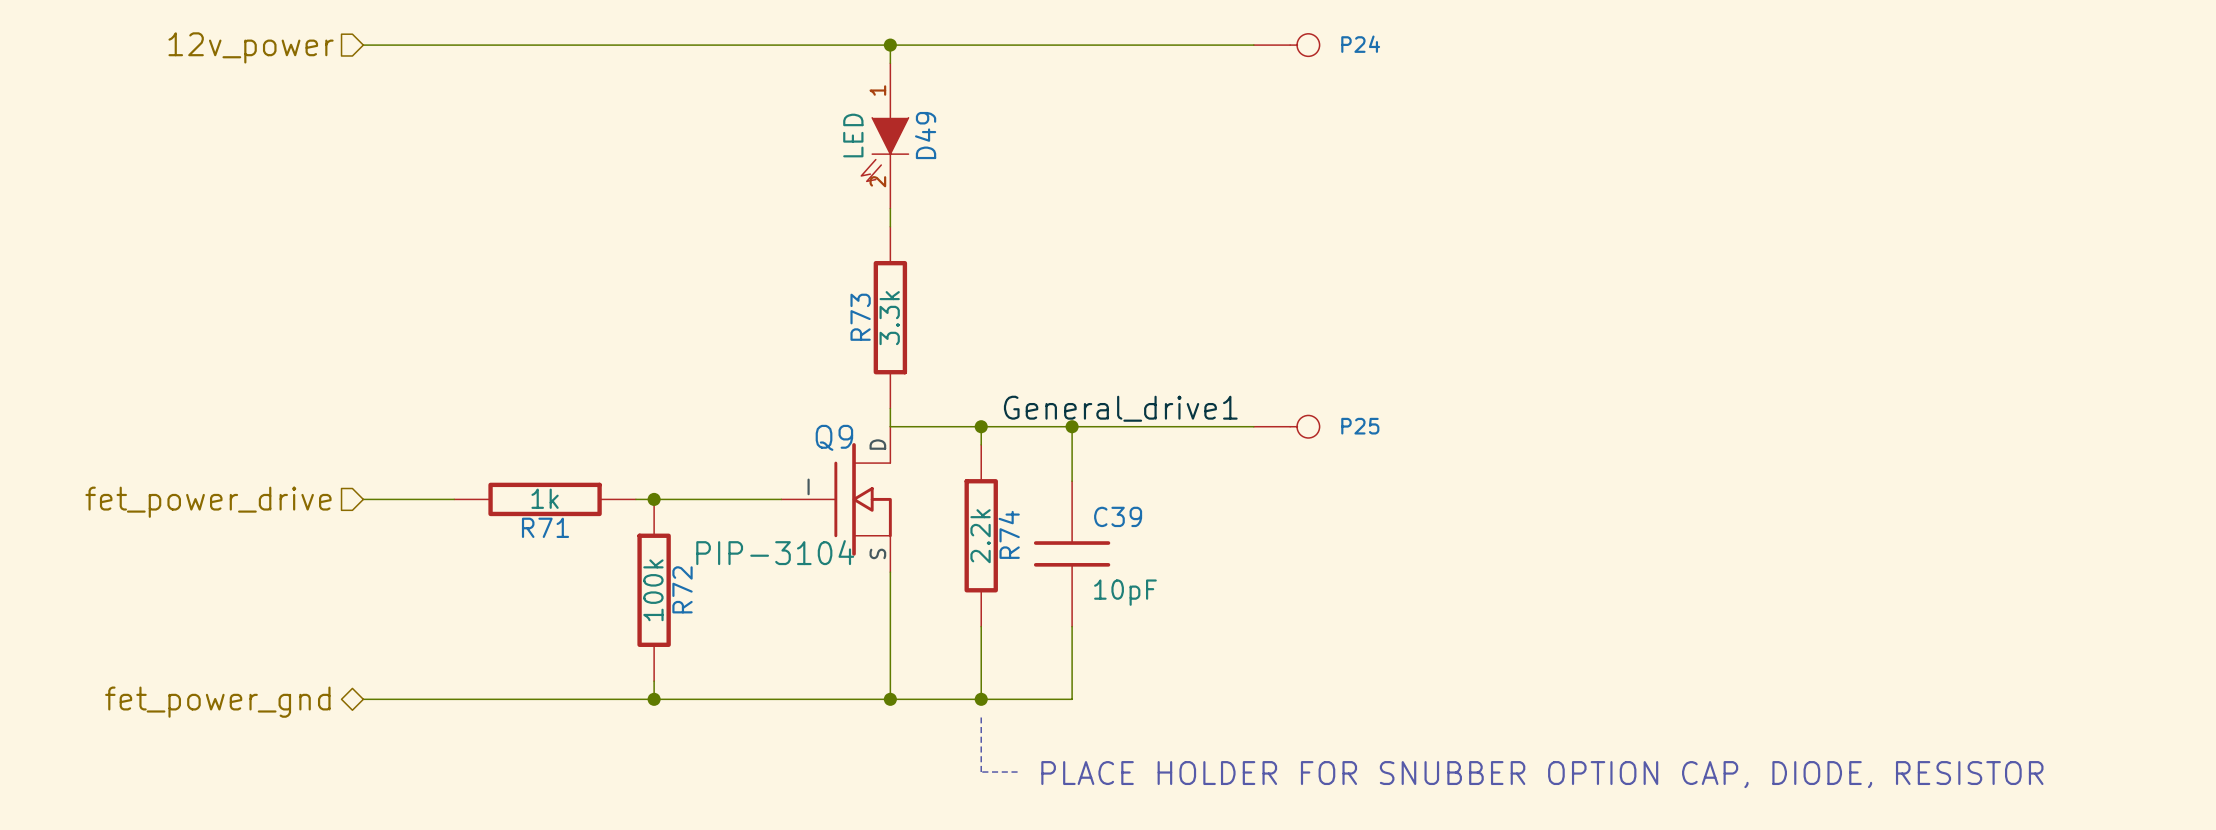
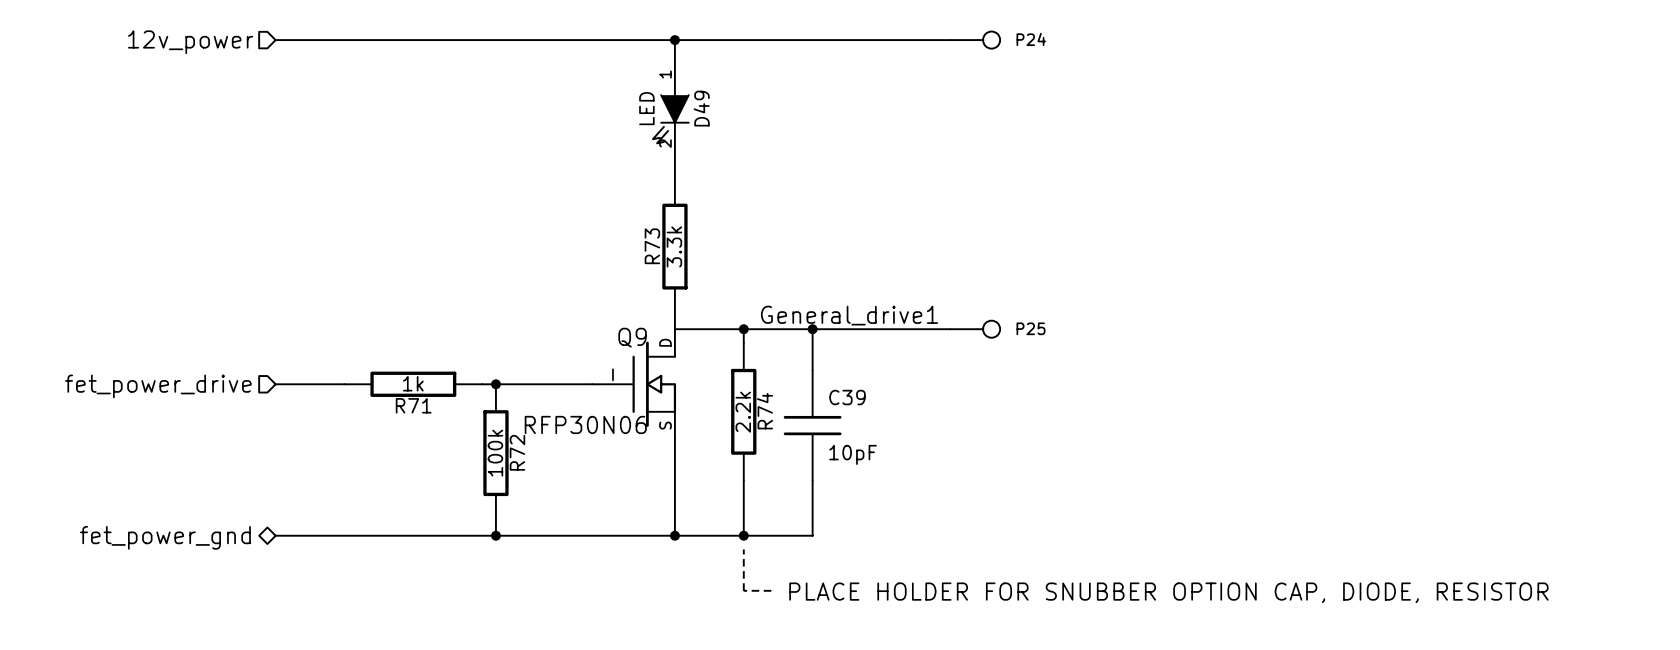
Q9 value: PIP-3104 (775, 552) -> RFP30N06 (585, 424)

